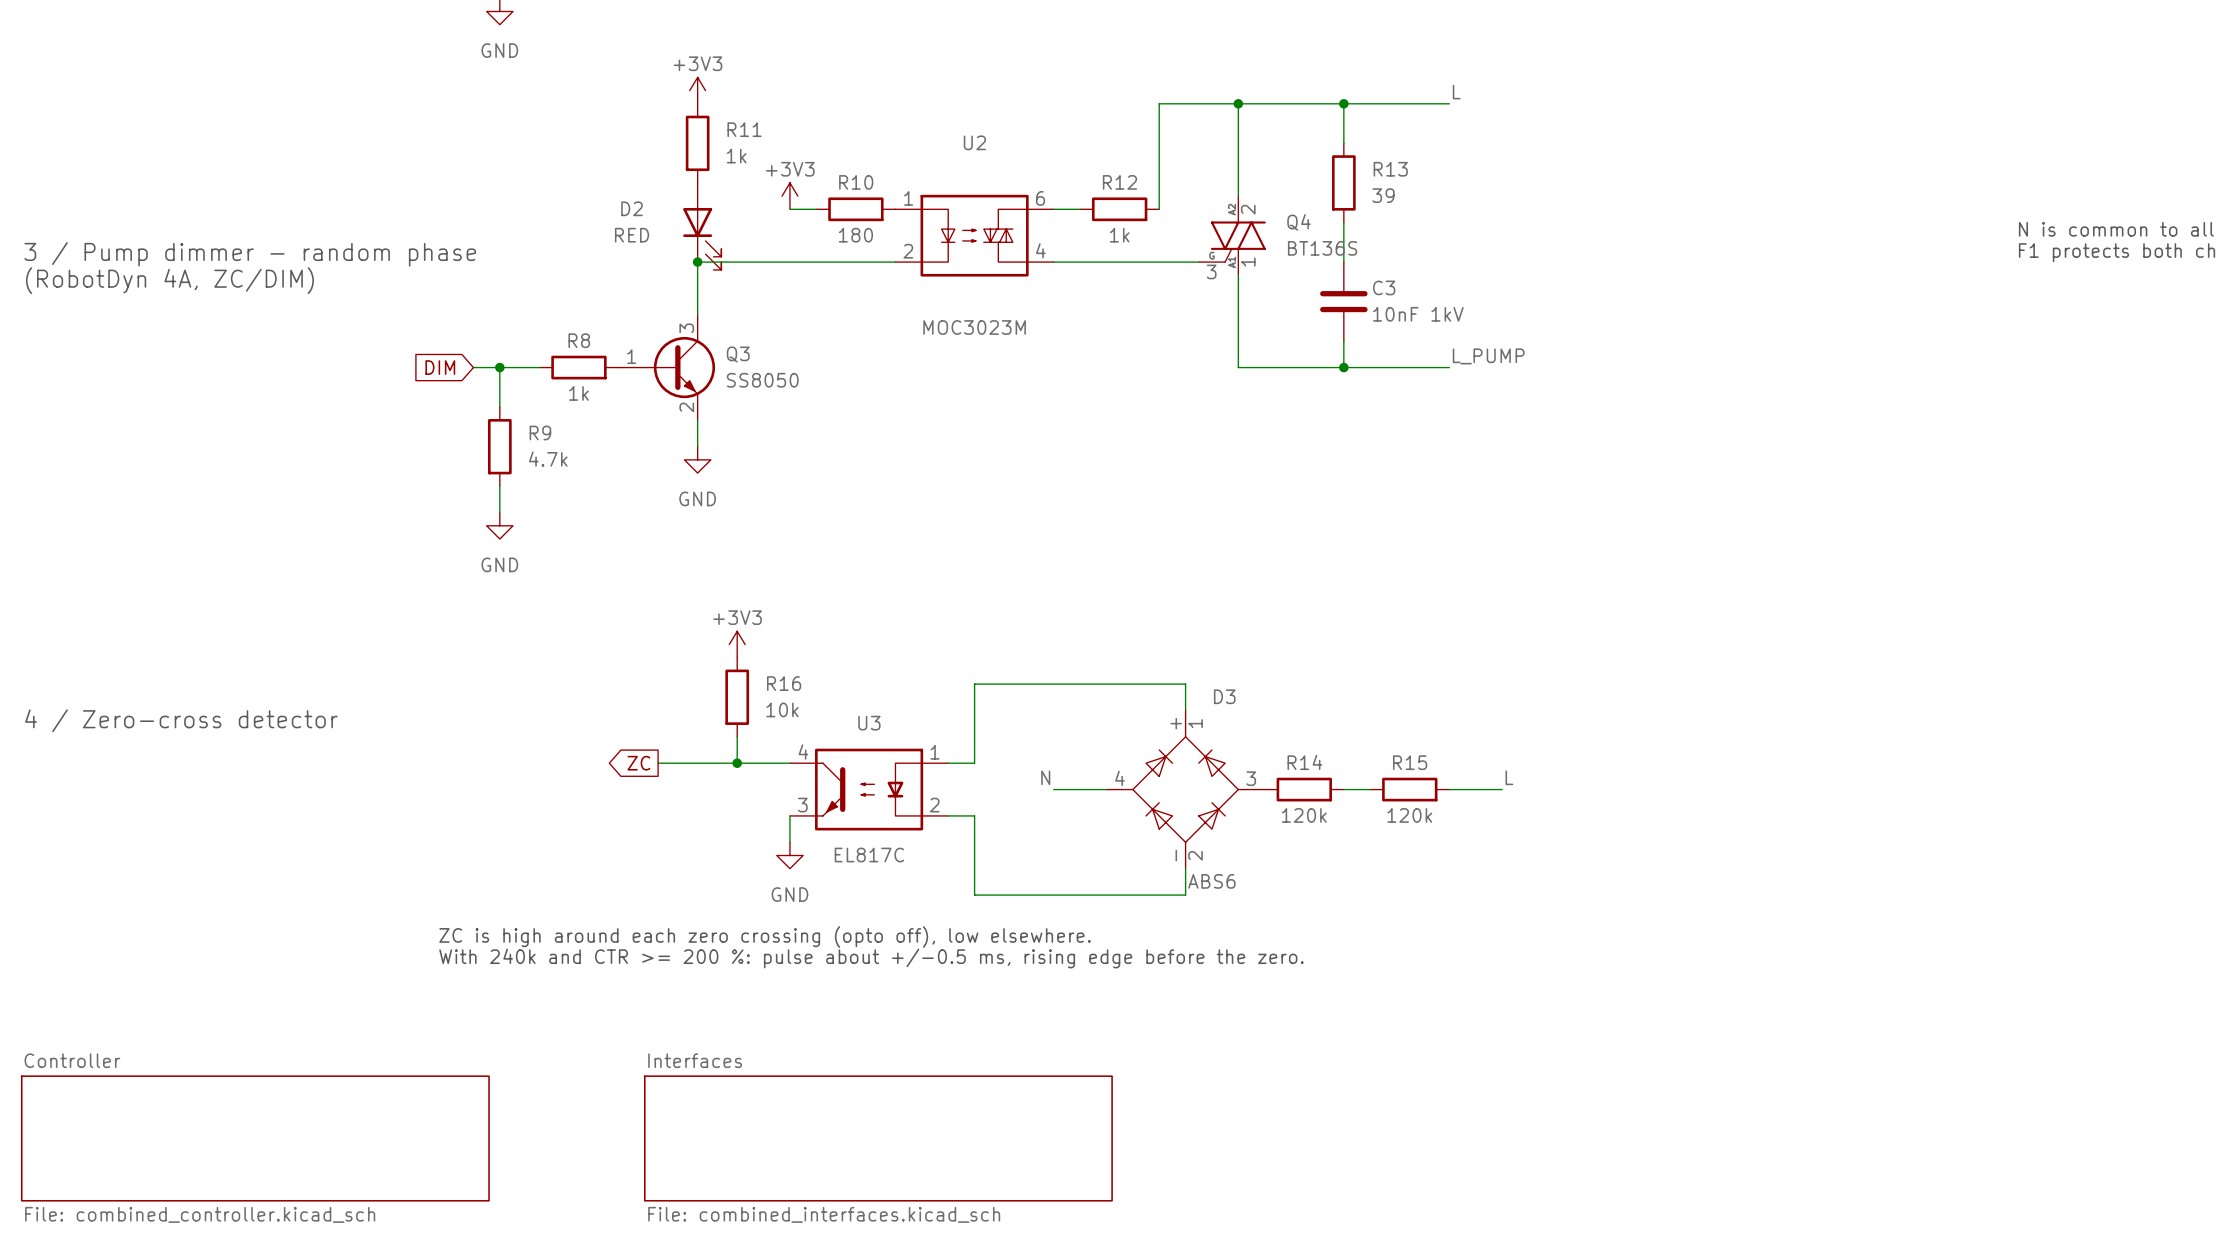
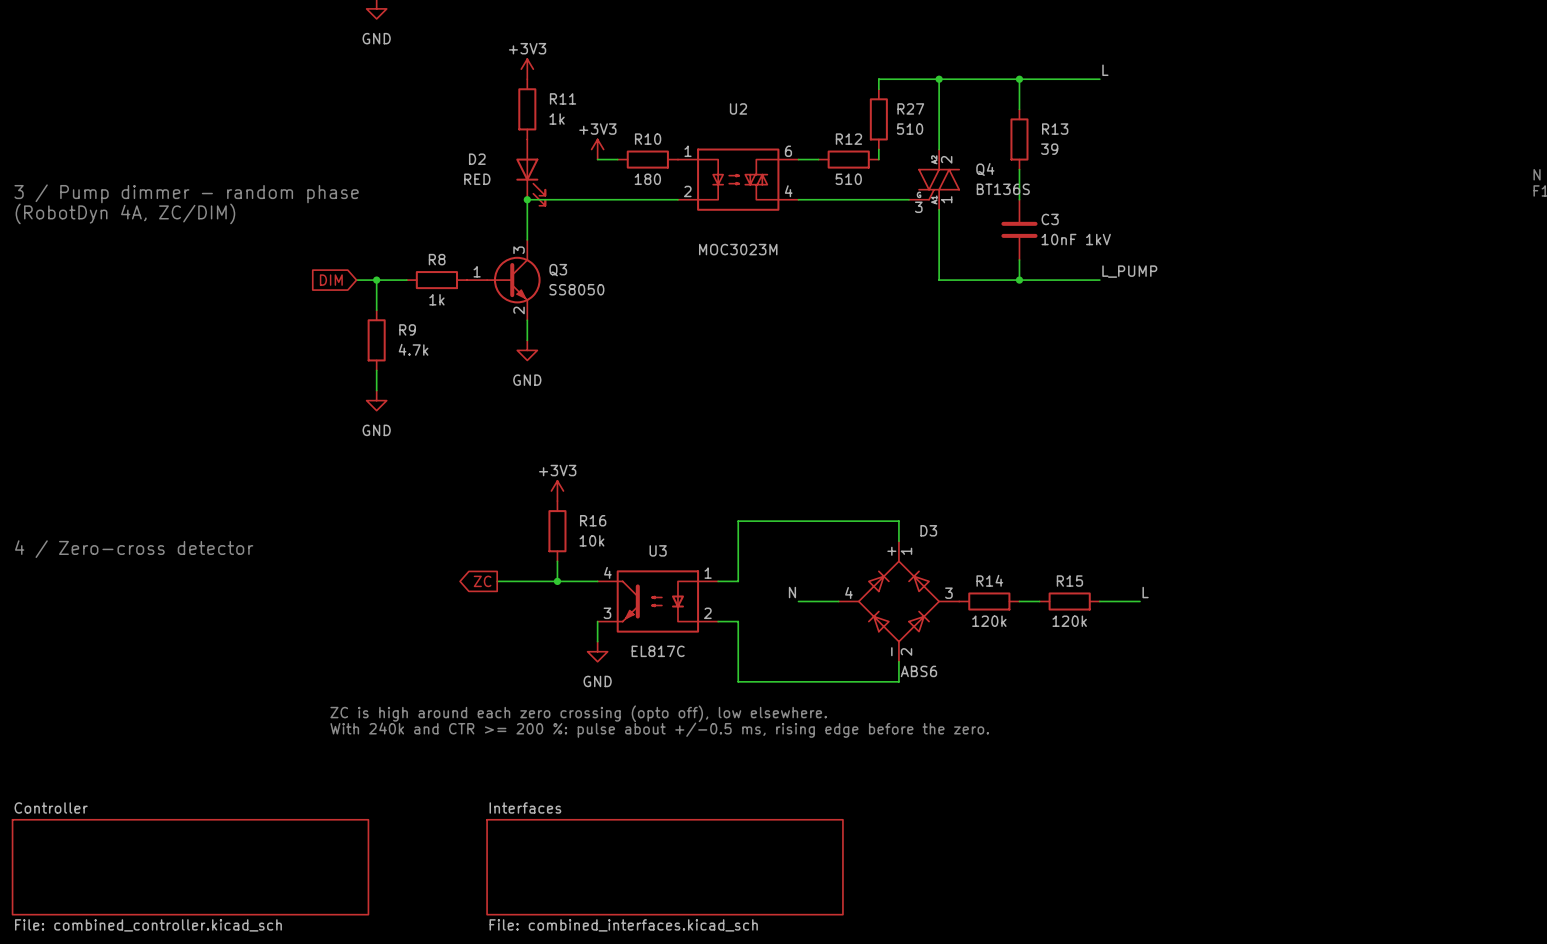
wire: (1159, 116) (1159, 196) -> none
R27: none -> 510 (878, 119)
R12 value: 1k (1119, 235) -> 510 (848, 179)

